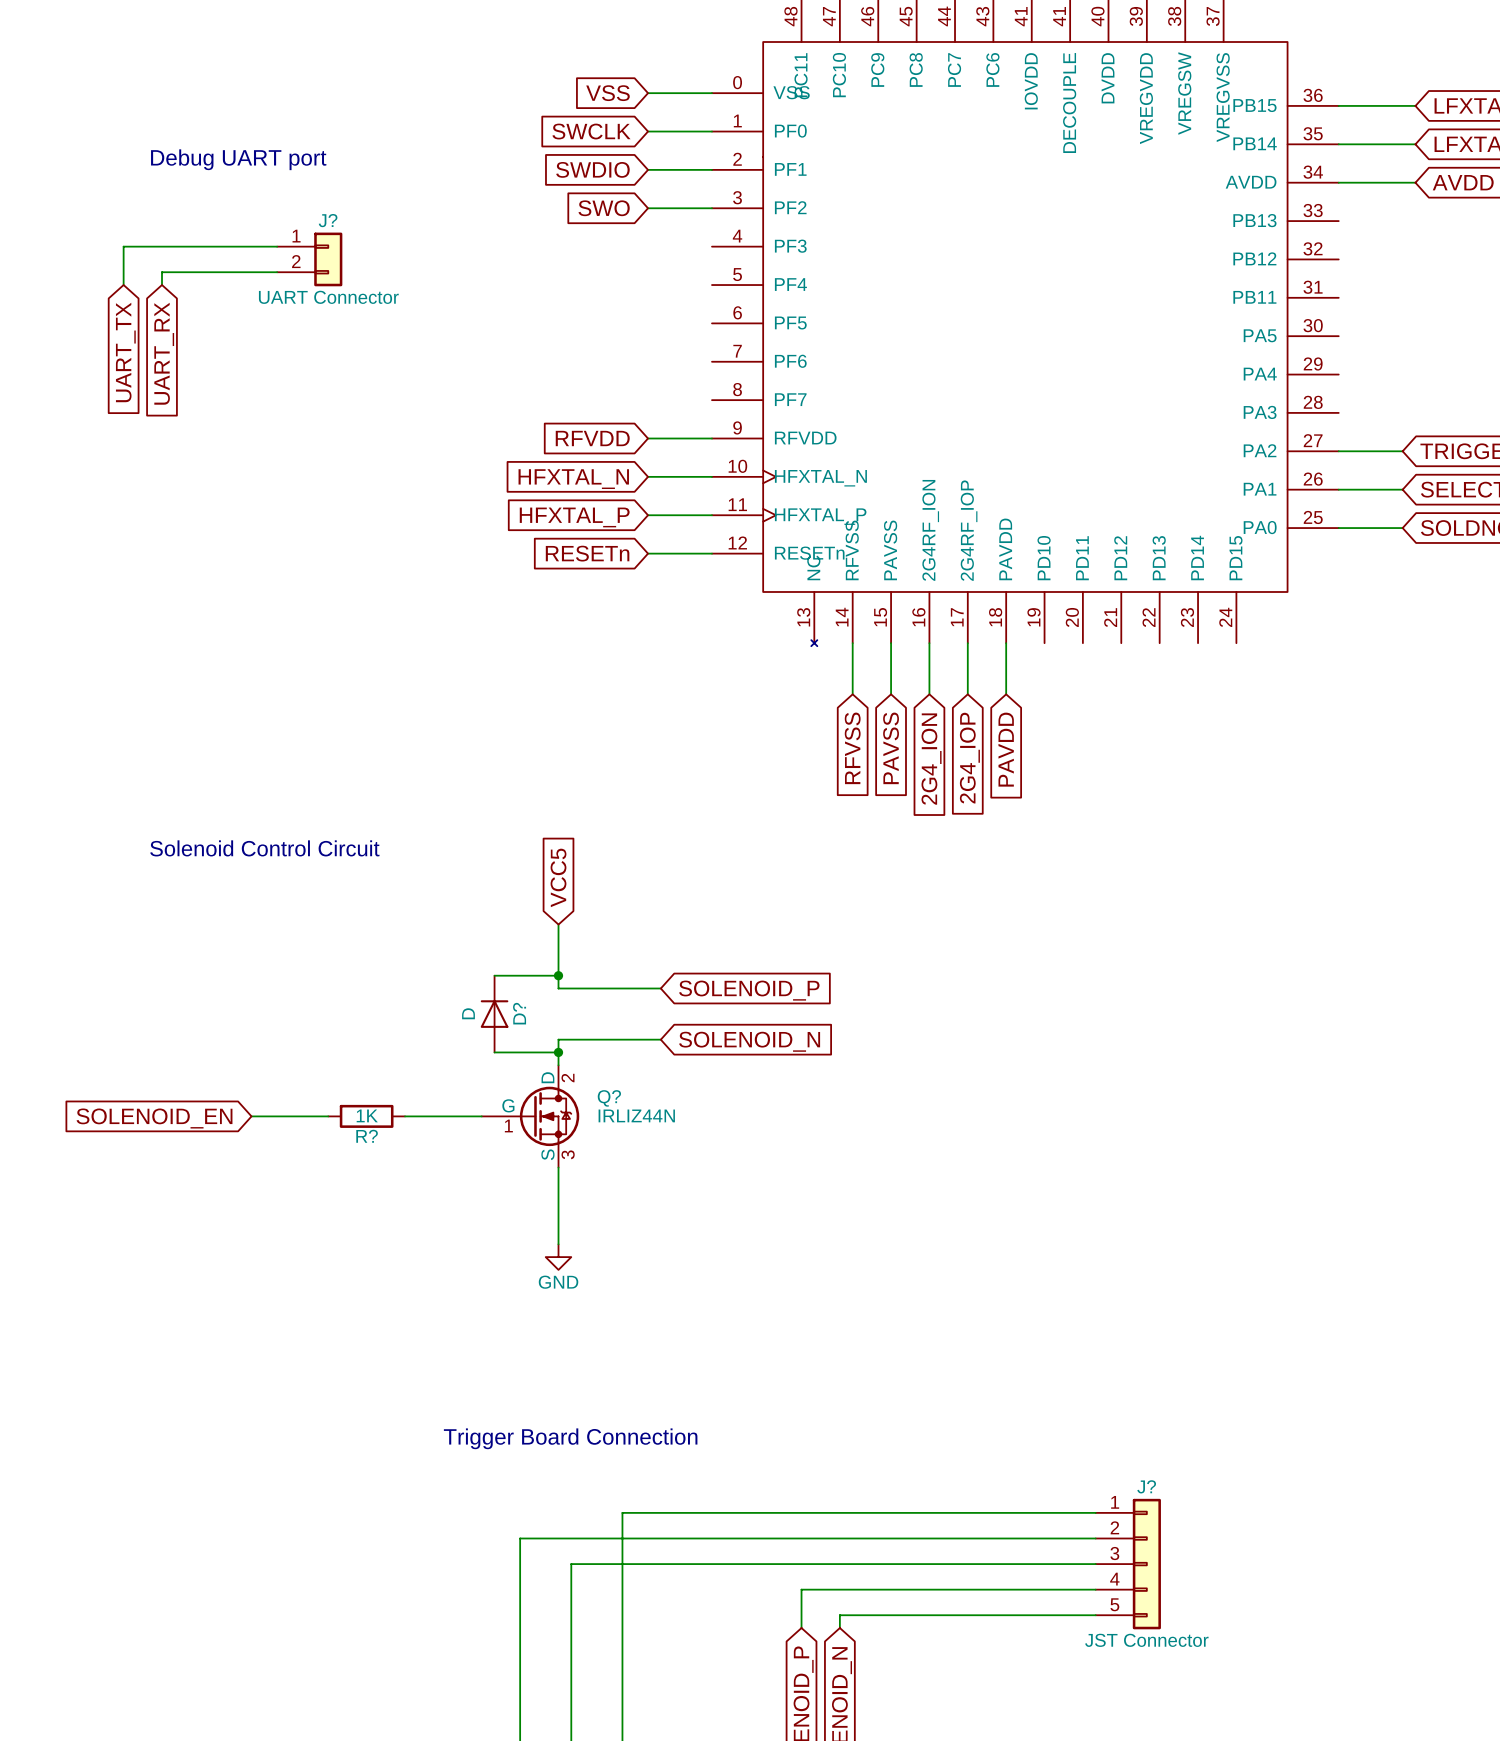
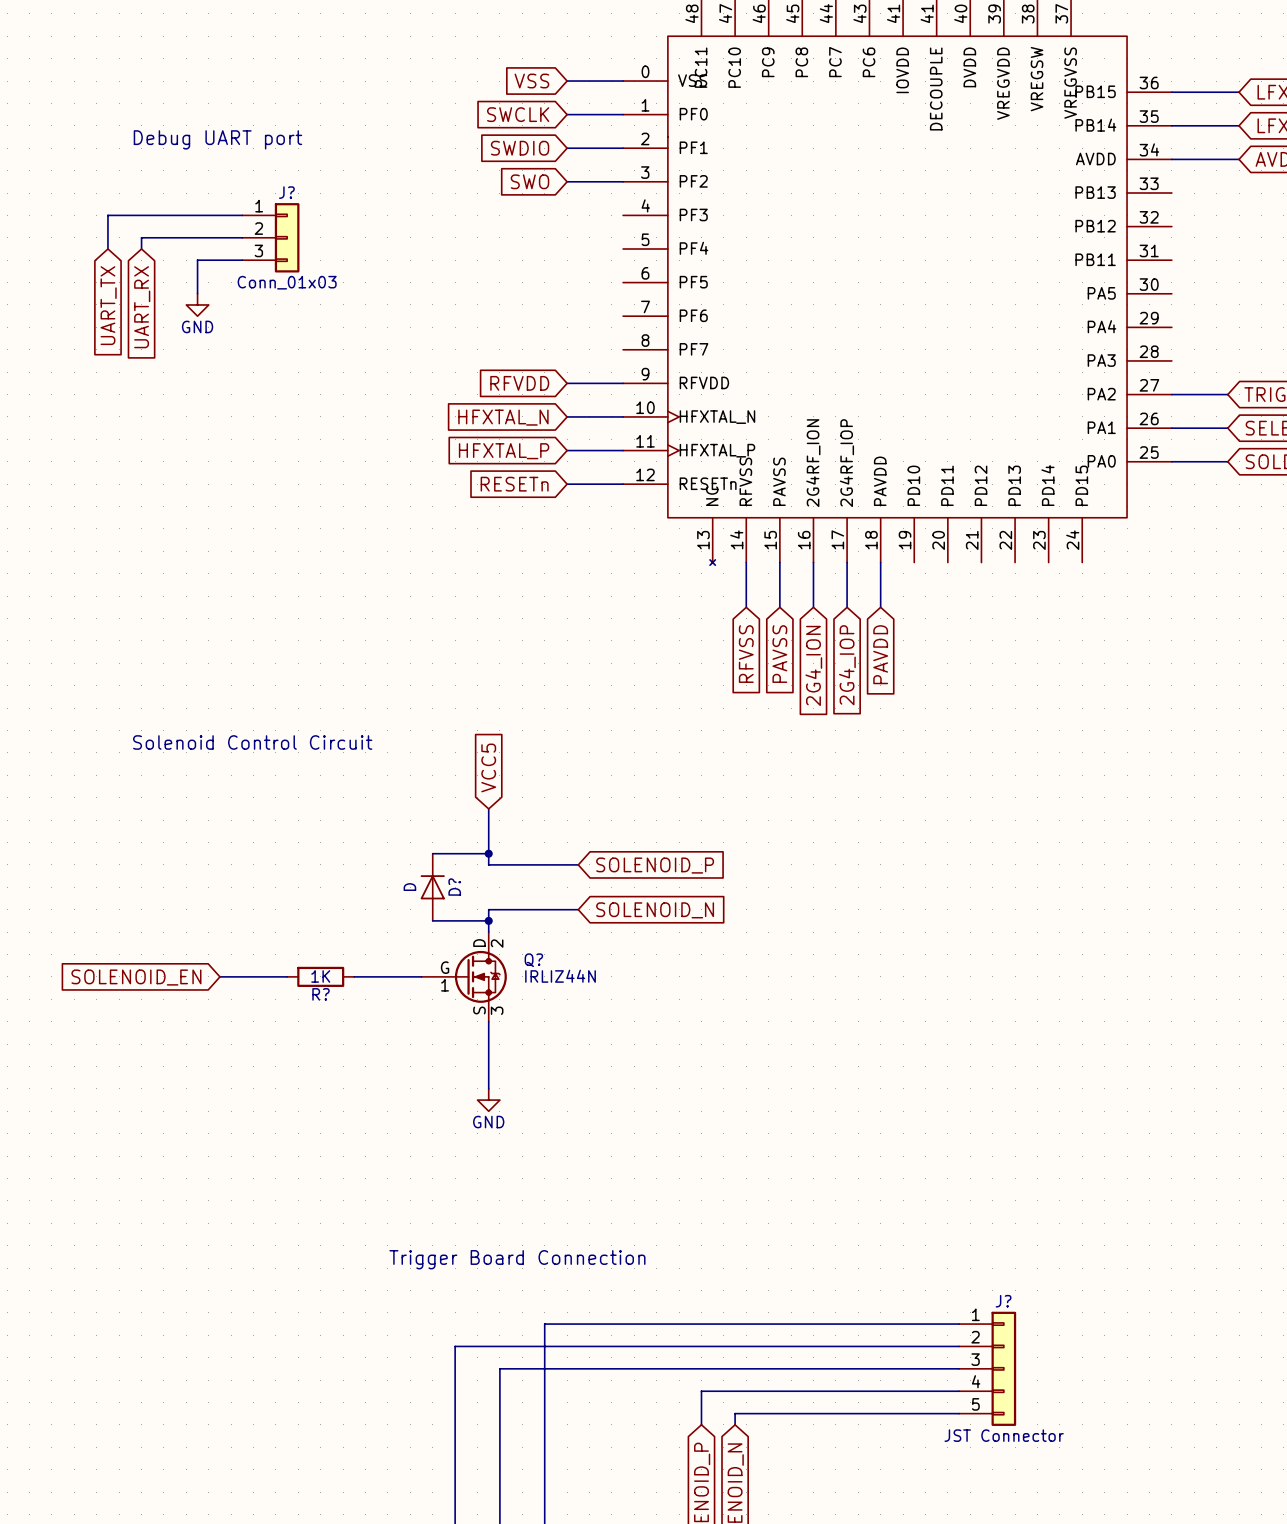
J?: UART Connector (309, 259) -> none
J?: none -> Conn_01x03 (270, 237)
wire: none -> (242, 260) (197, 260) (197, 293)
power symbol: none -> GND (197, 304)

